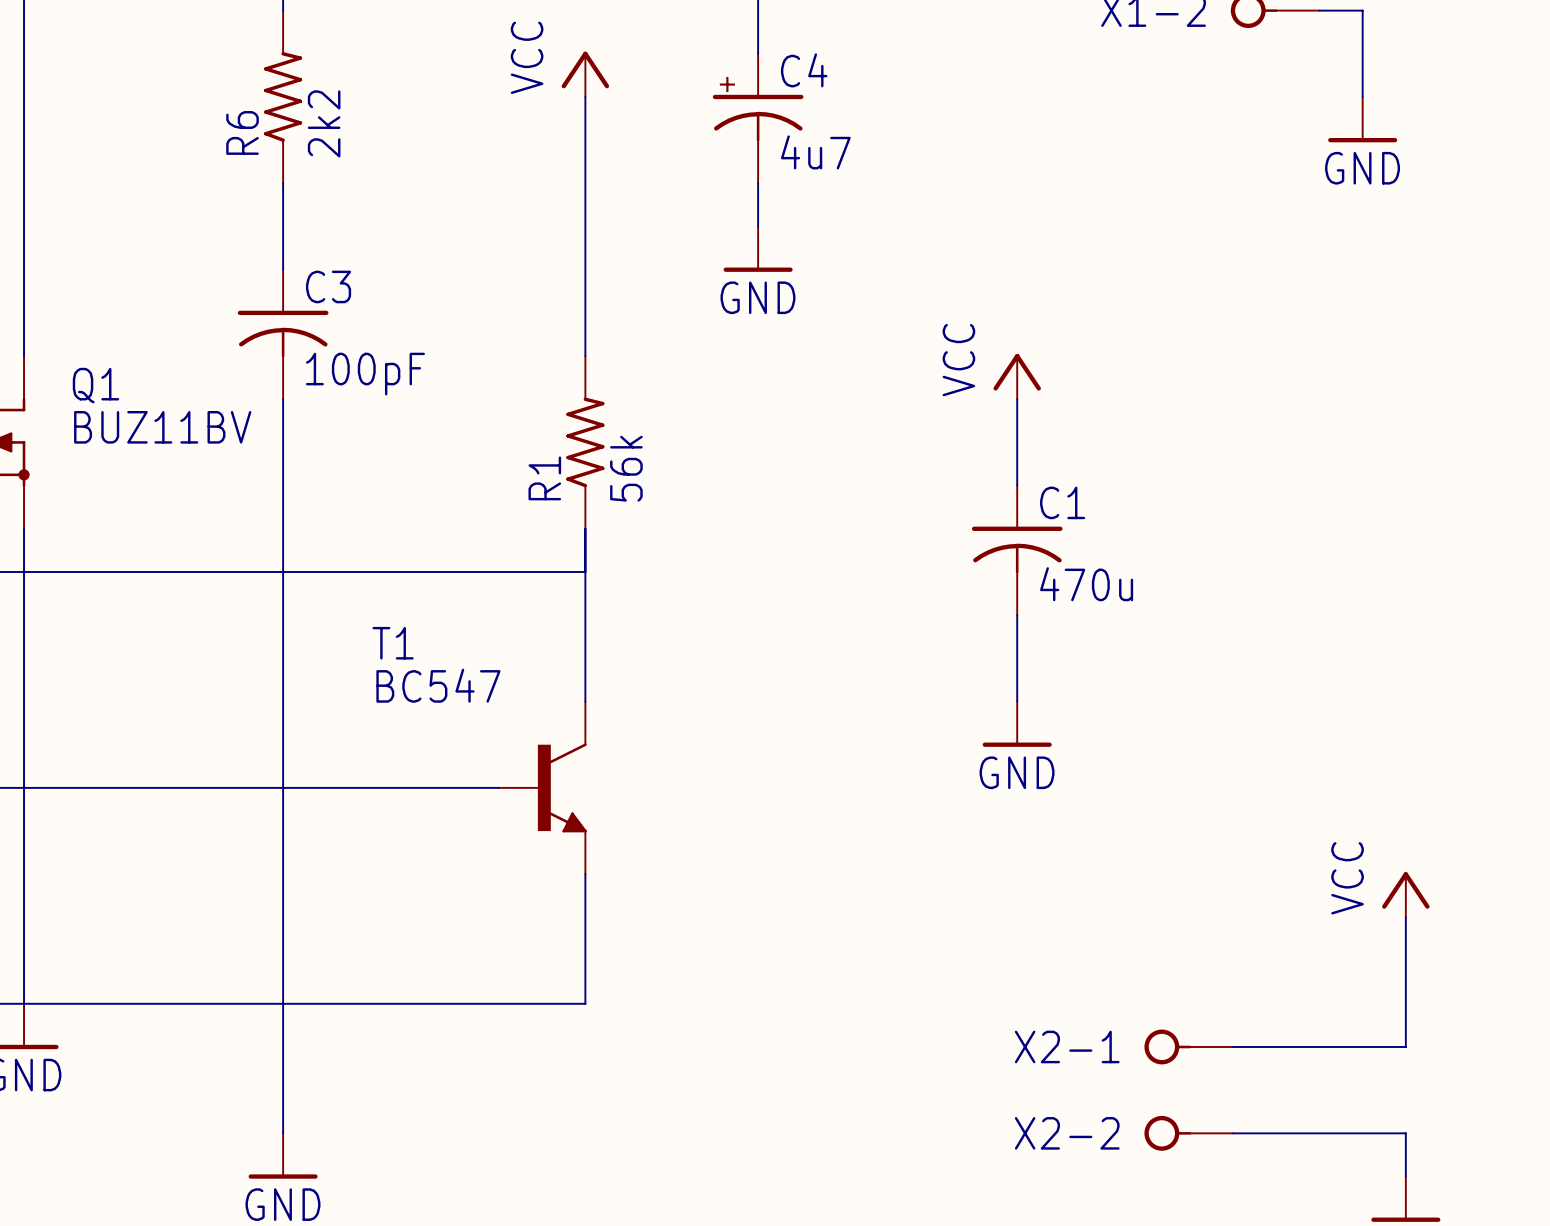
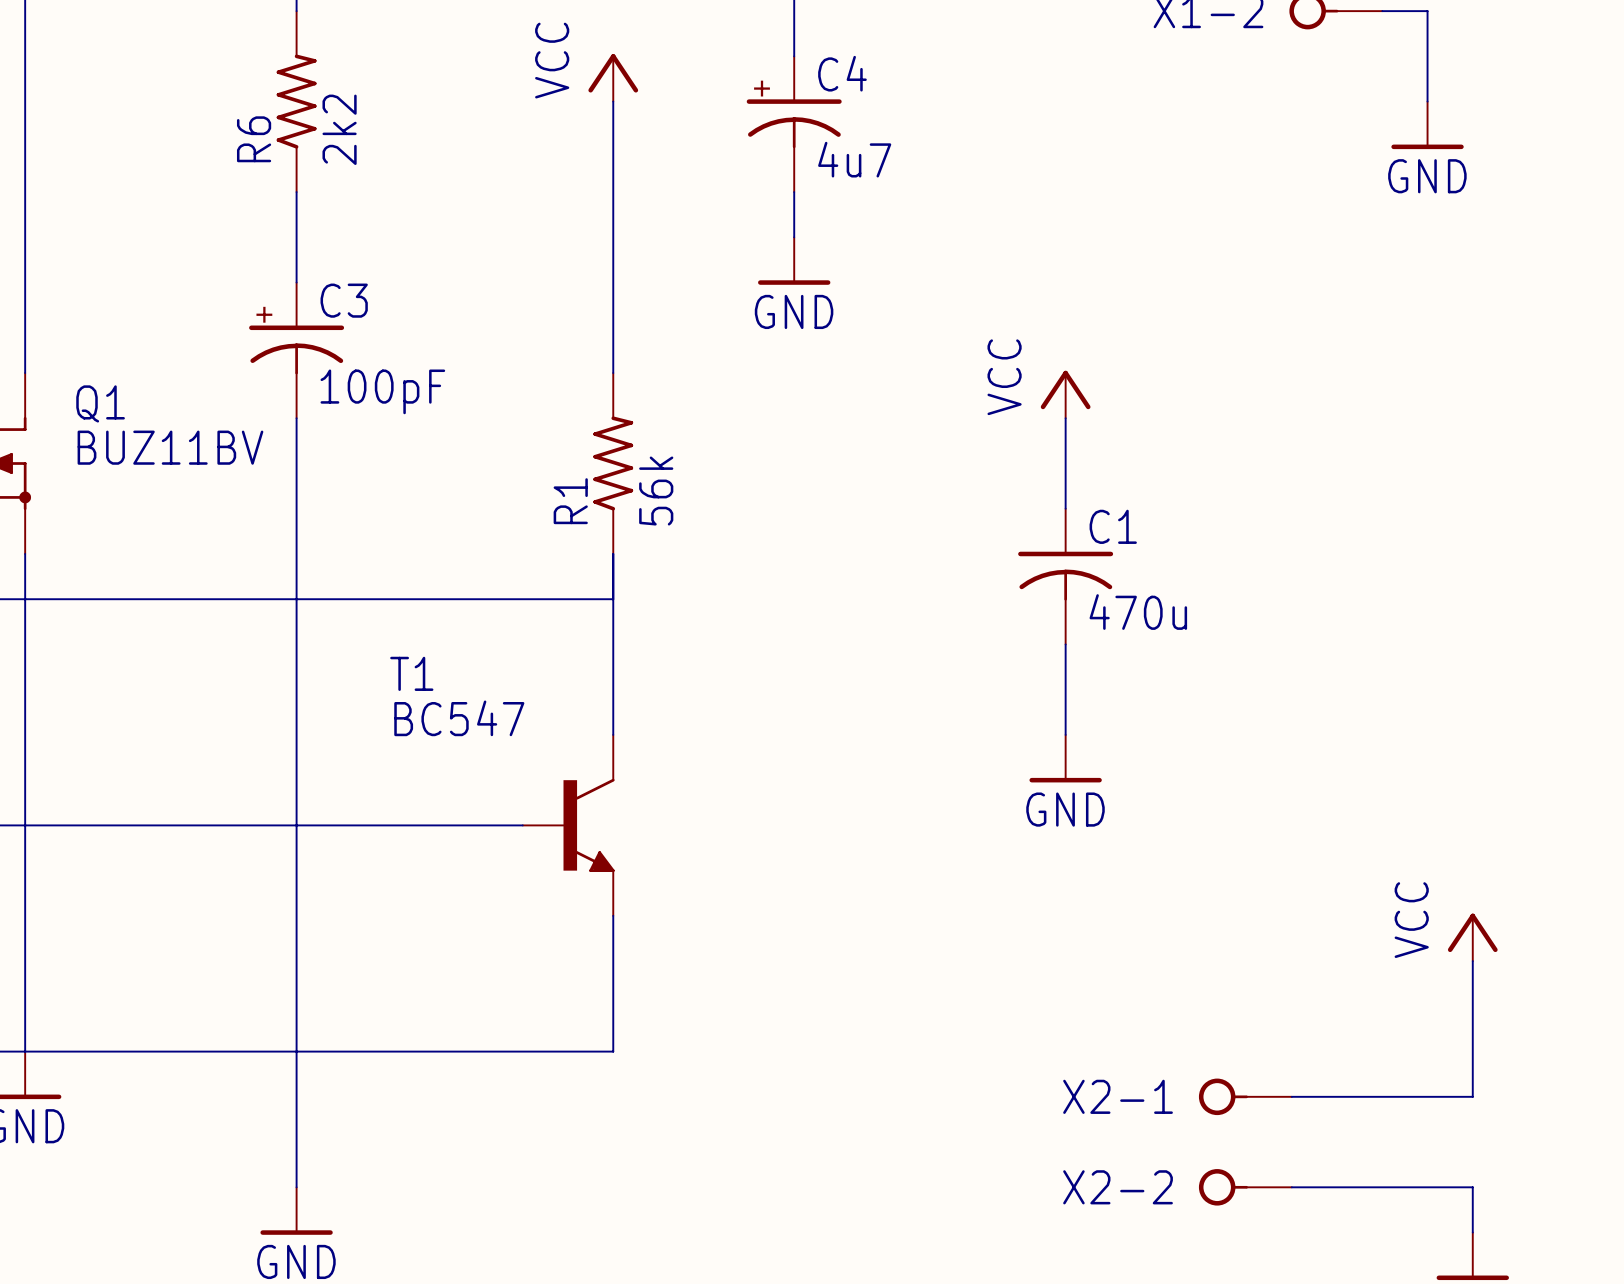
C3 symbol: [237, 269, 329, 400] -> [249, 282, 345, 419]

